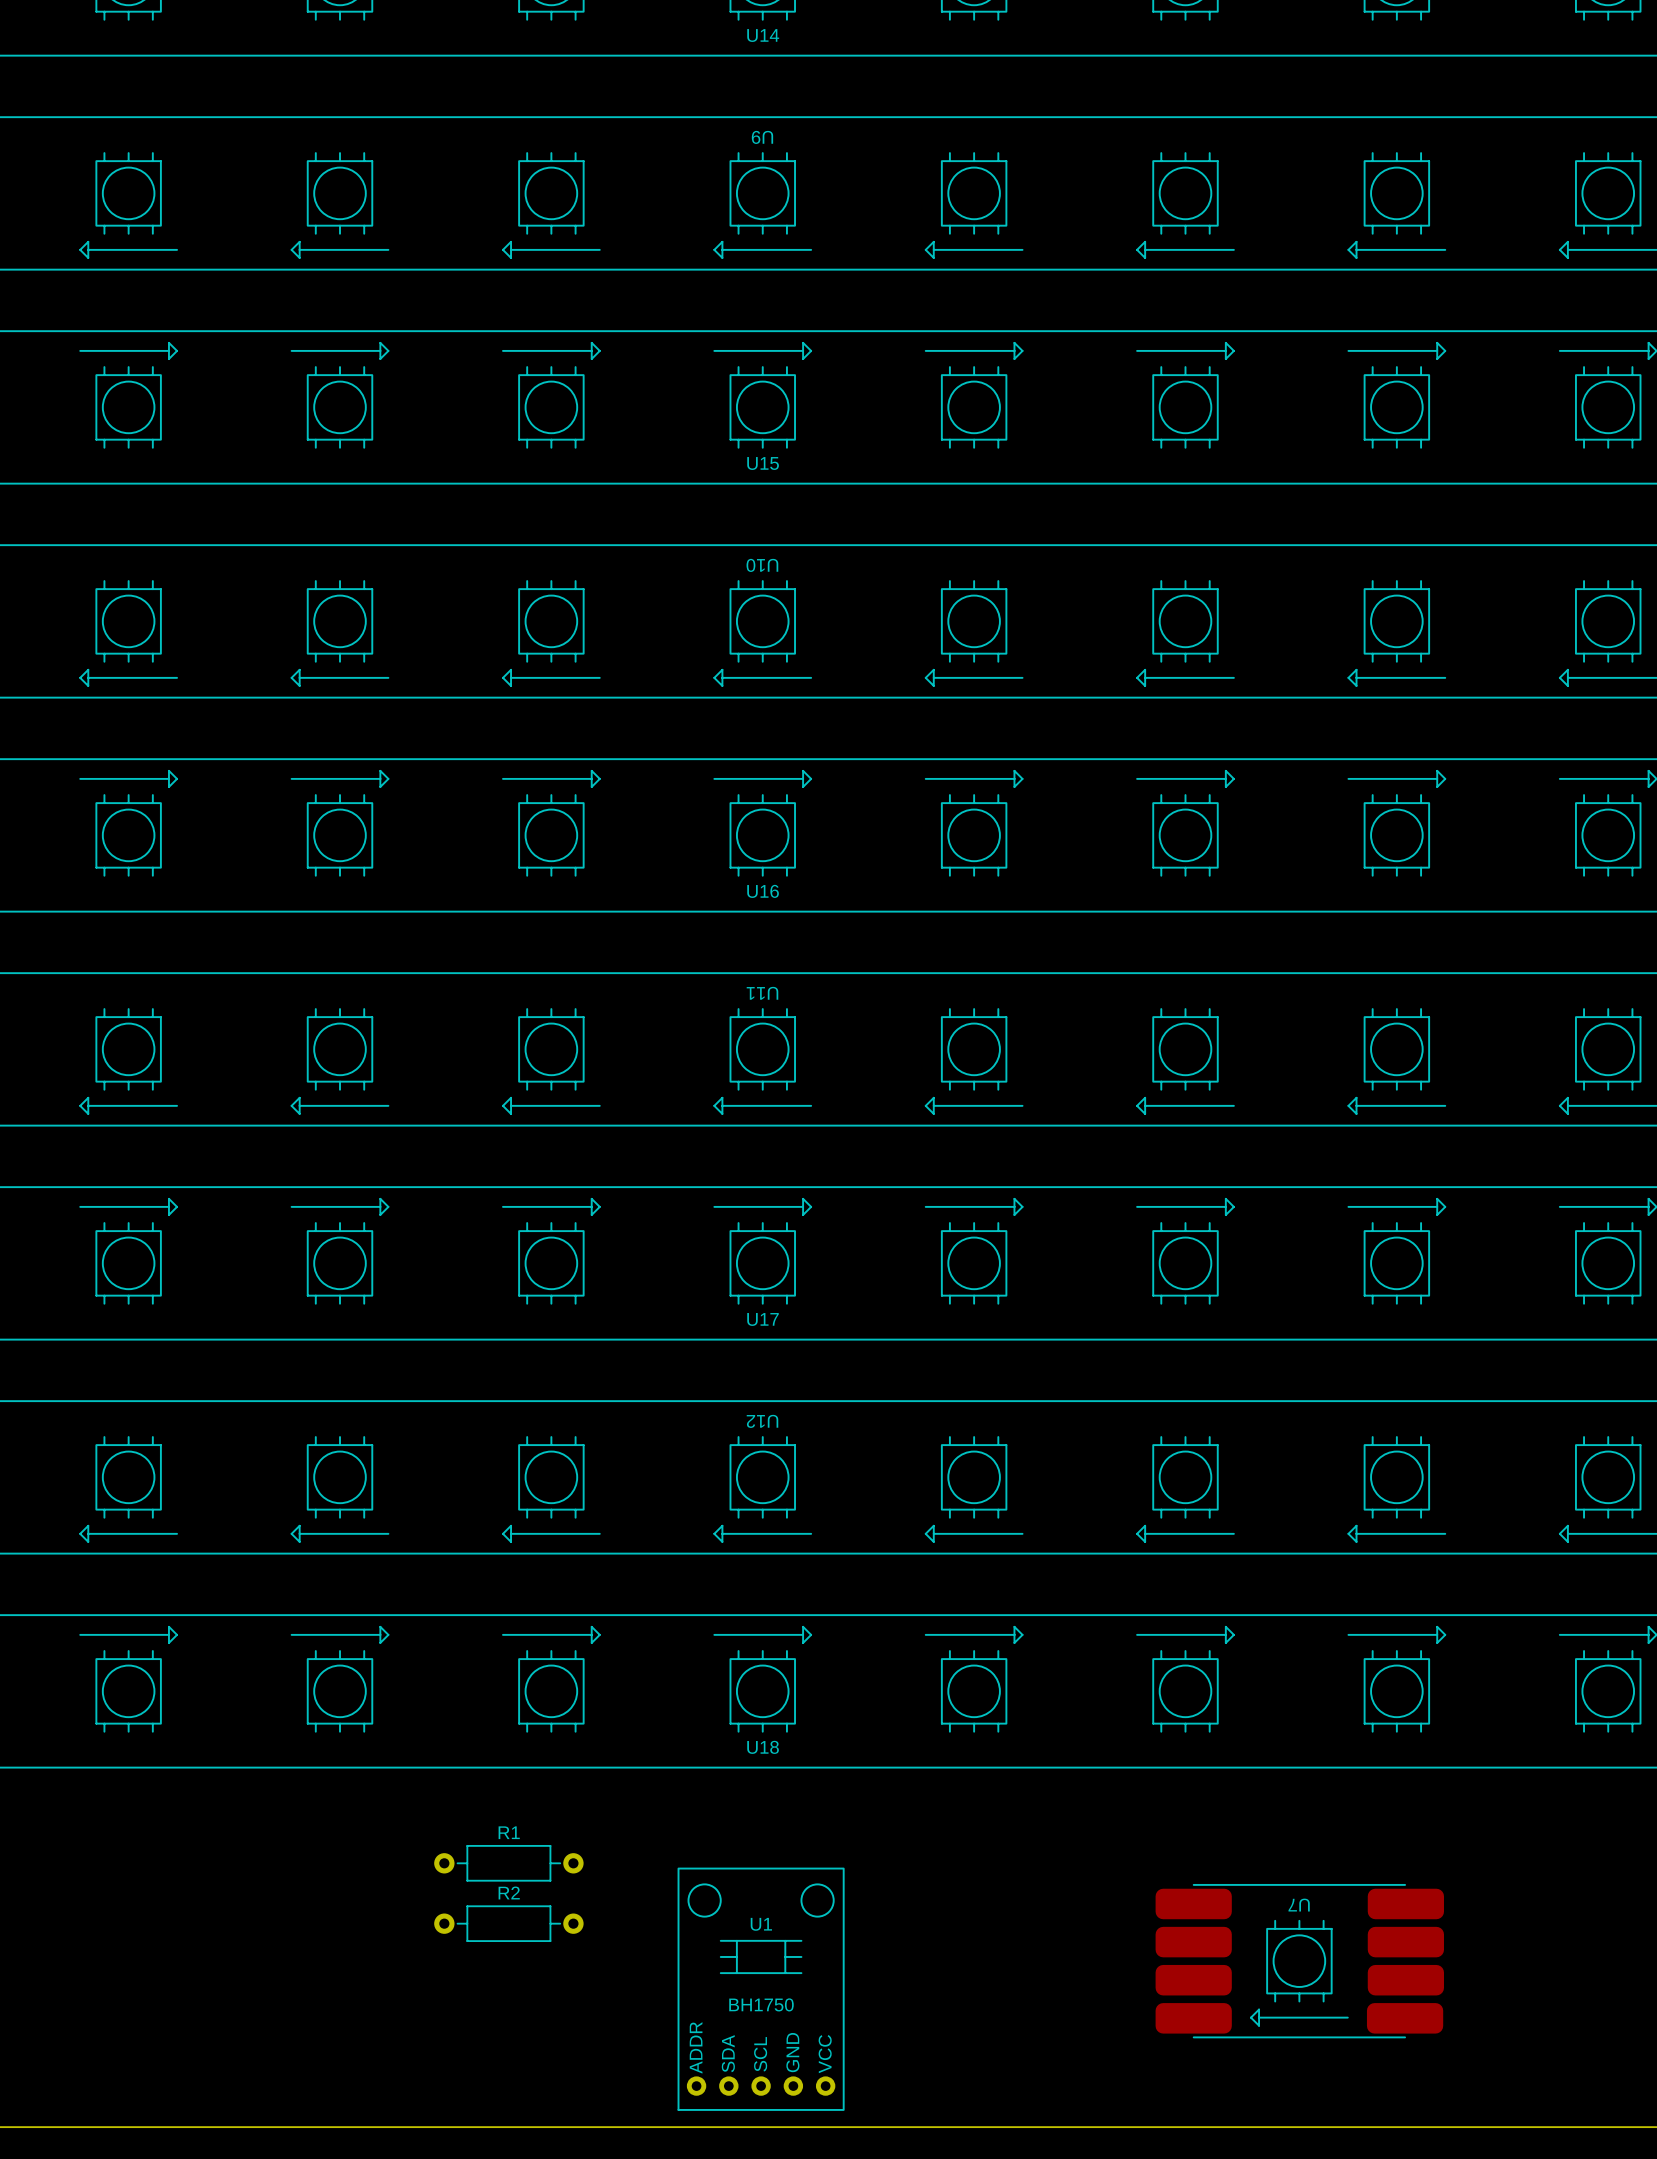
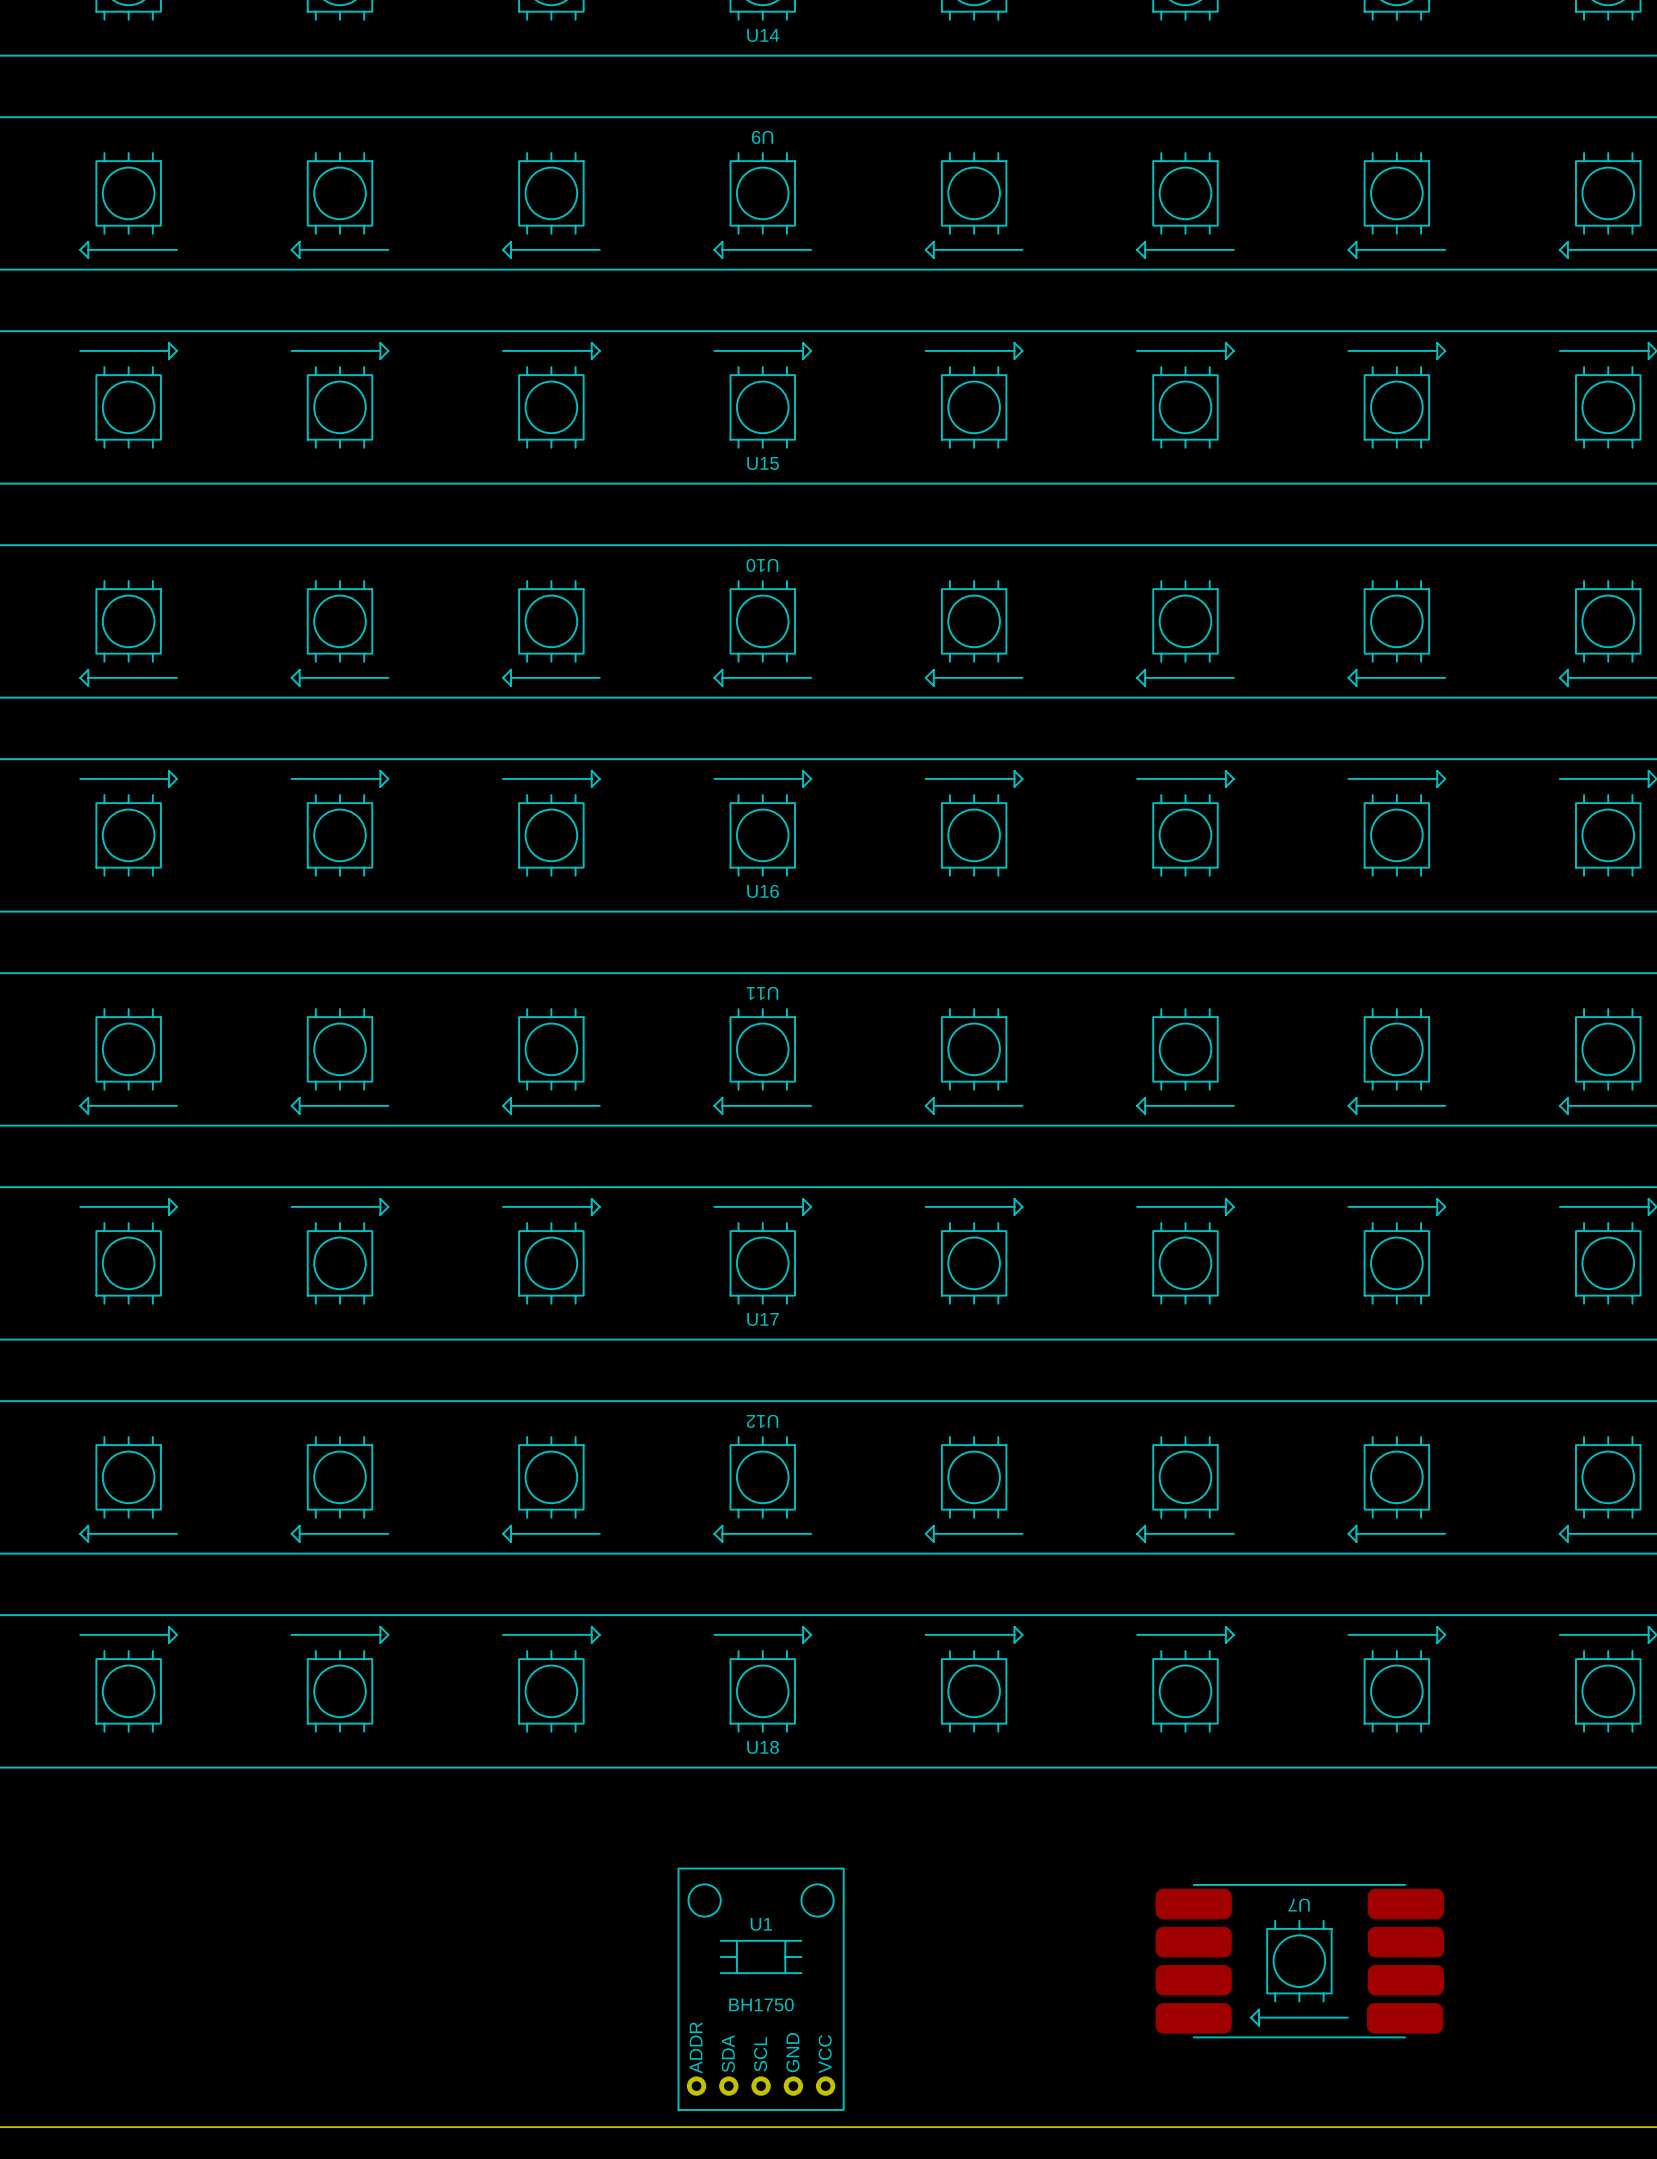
R1: (508, 1863) -> none
R2: (508, 1923) -> none

